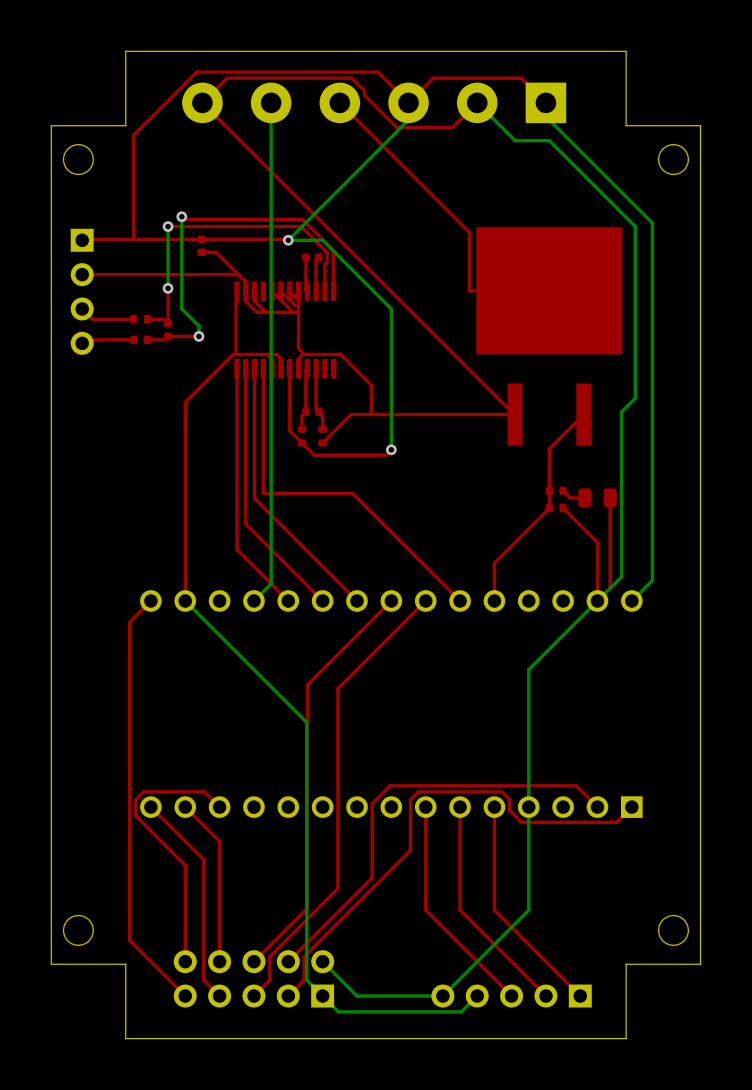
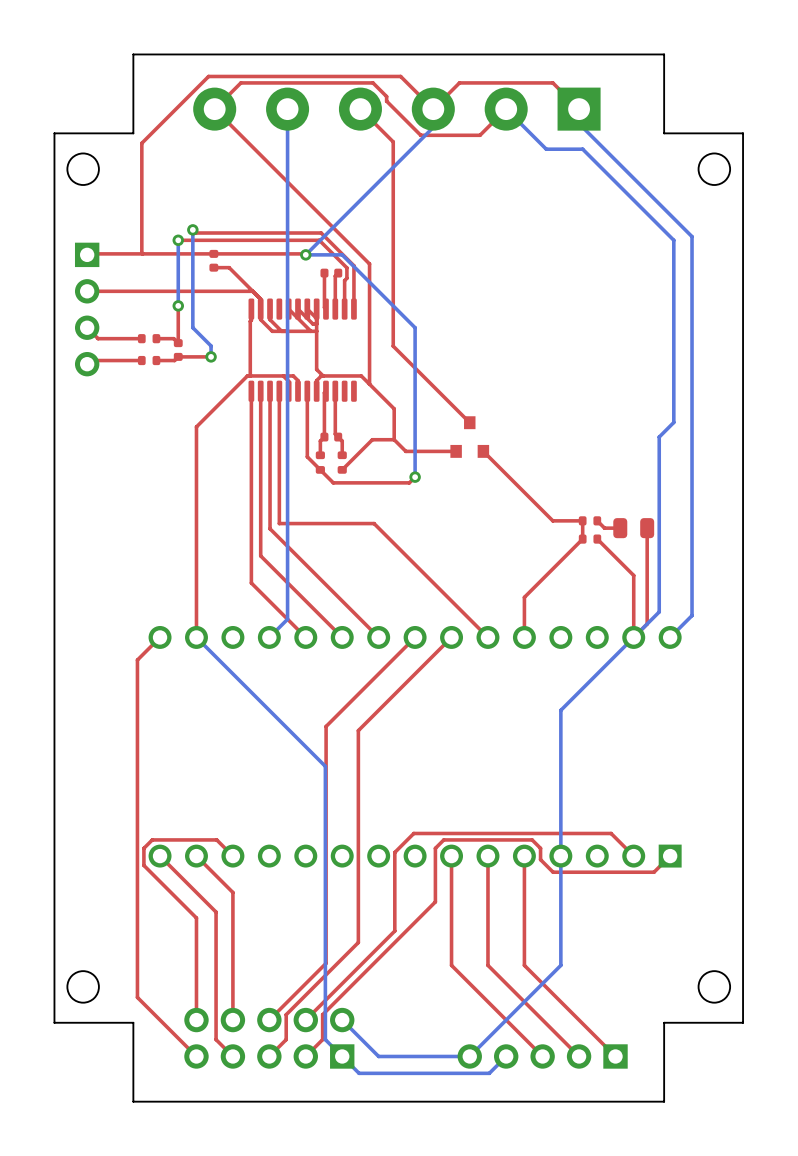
top track: (370, 133) (469, 232) (469, 290) (549, 290) -> (393, 141) (393, 346) (469, 422)
top track: (348, 248) (514, 414) -> (369, 263) (369, 384)
part: (549, 336) -> none
part: none -> (469, 437)
top track: (515, 414) (371, 414) -> (456, 451) (405, 451) (394, 439)
top track: (583, 414) (549, 448) (549, 491) -> (483, 451) (552, 520) (582, 520)

